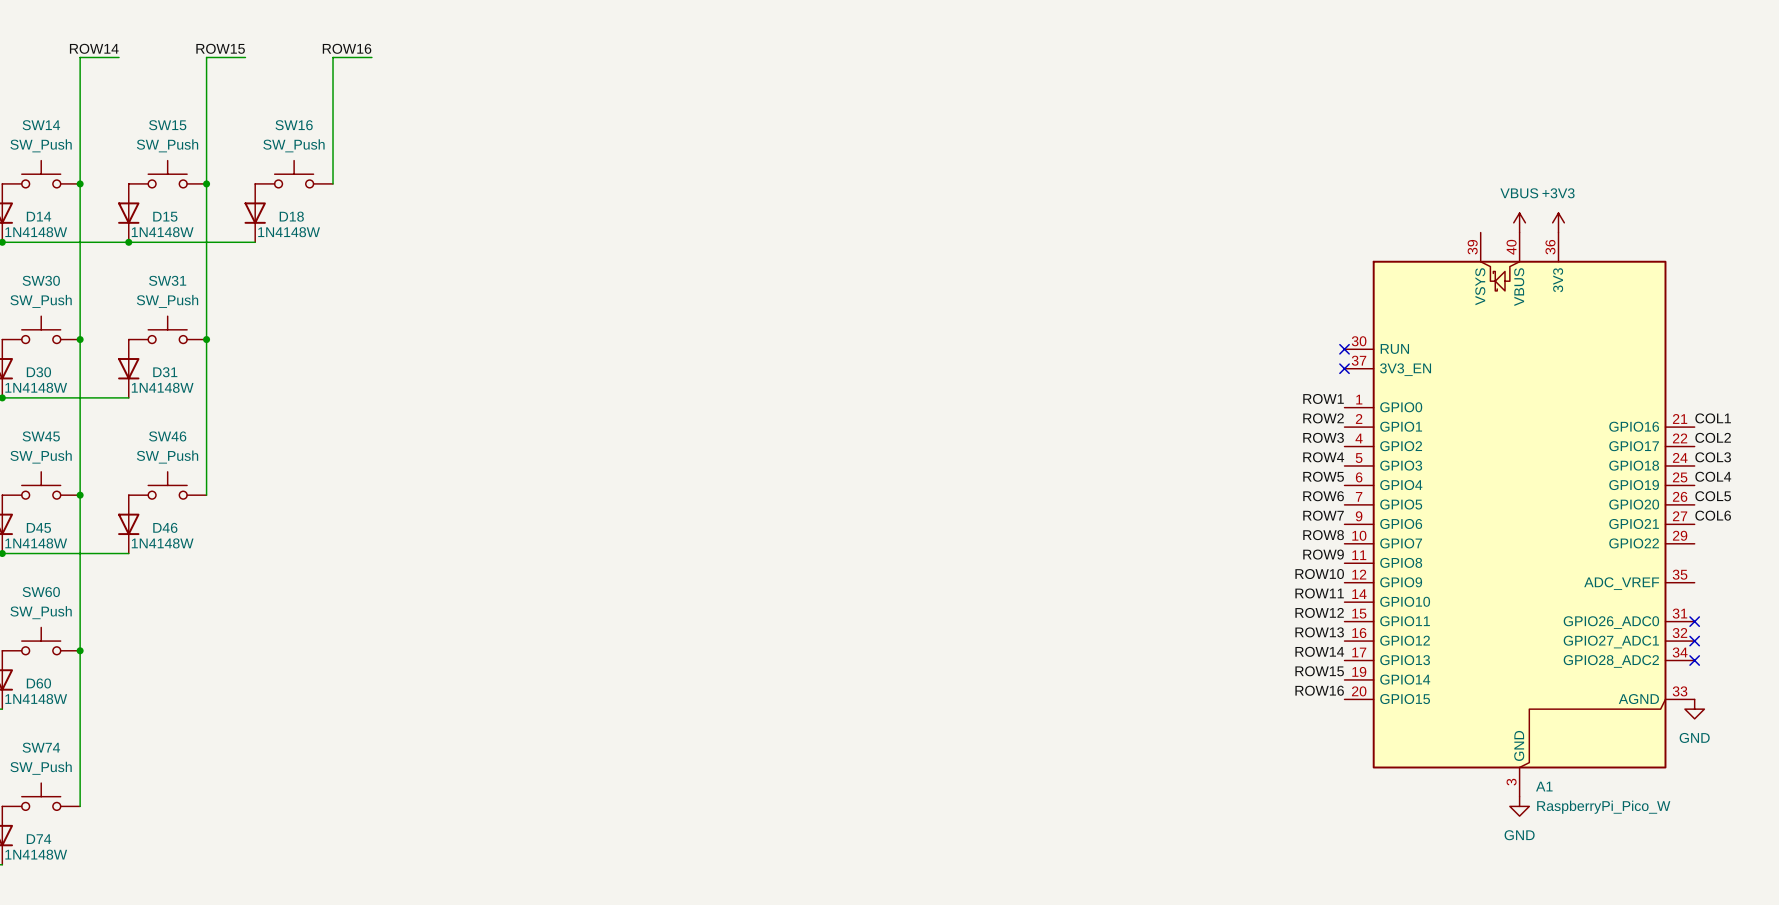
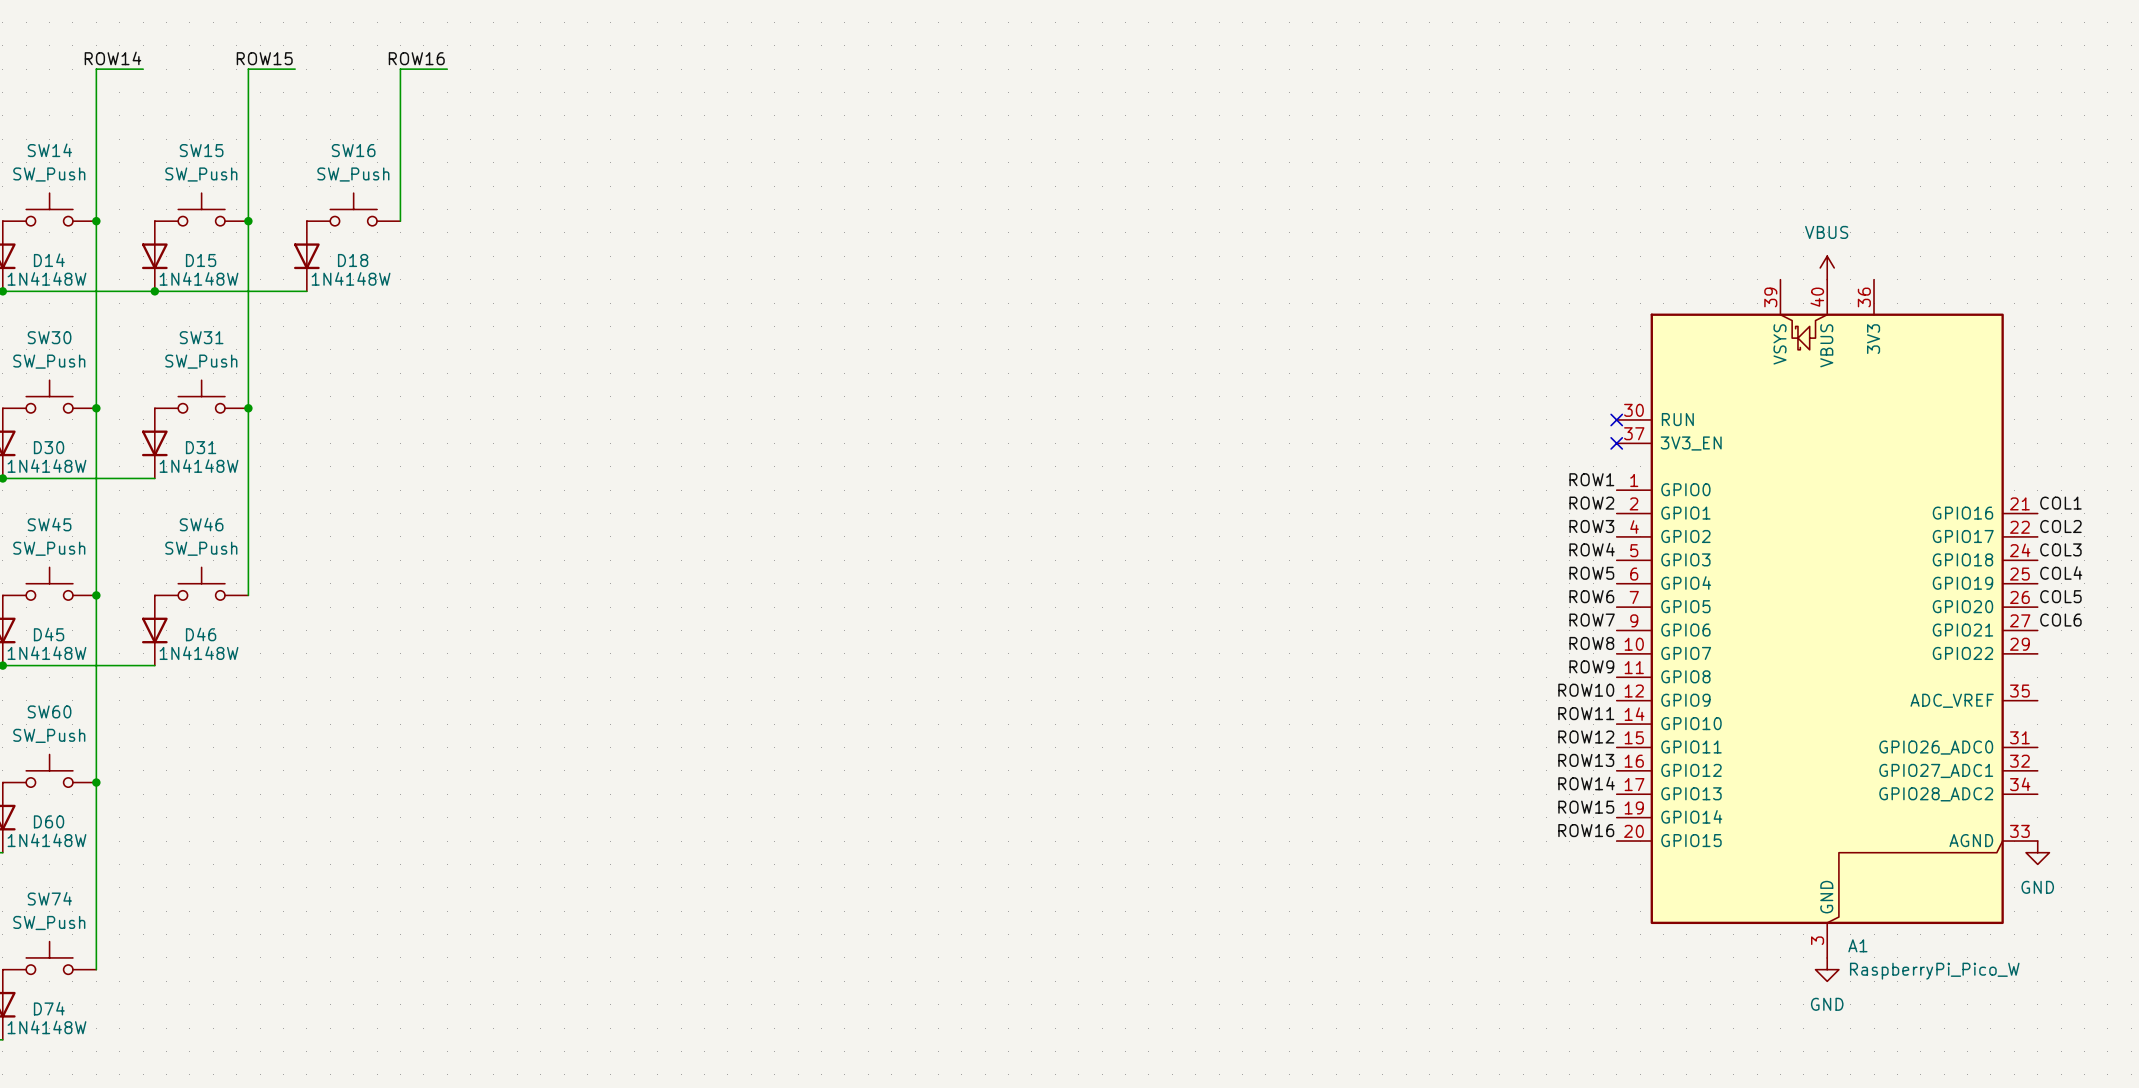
power symbol: +3V3 (1558, 222) -> none
no-connect mark: (1694, 621) -> none
no-connect mark: (1694, 641) -> none
no-connect mark: (1694, 660) -> none

